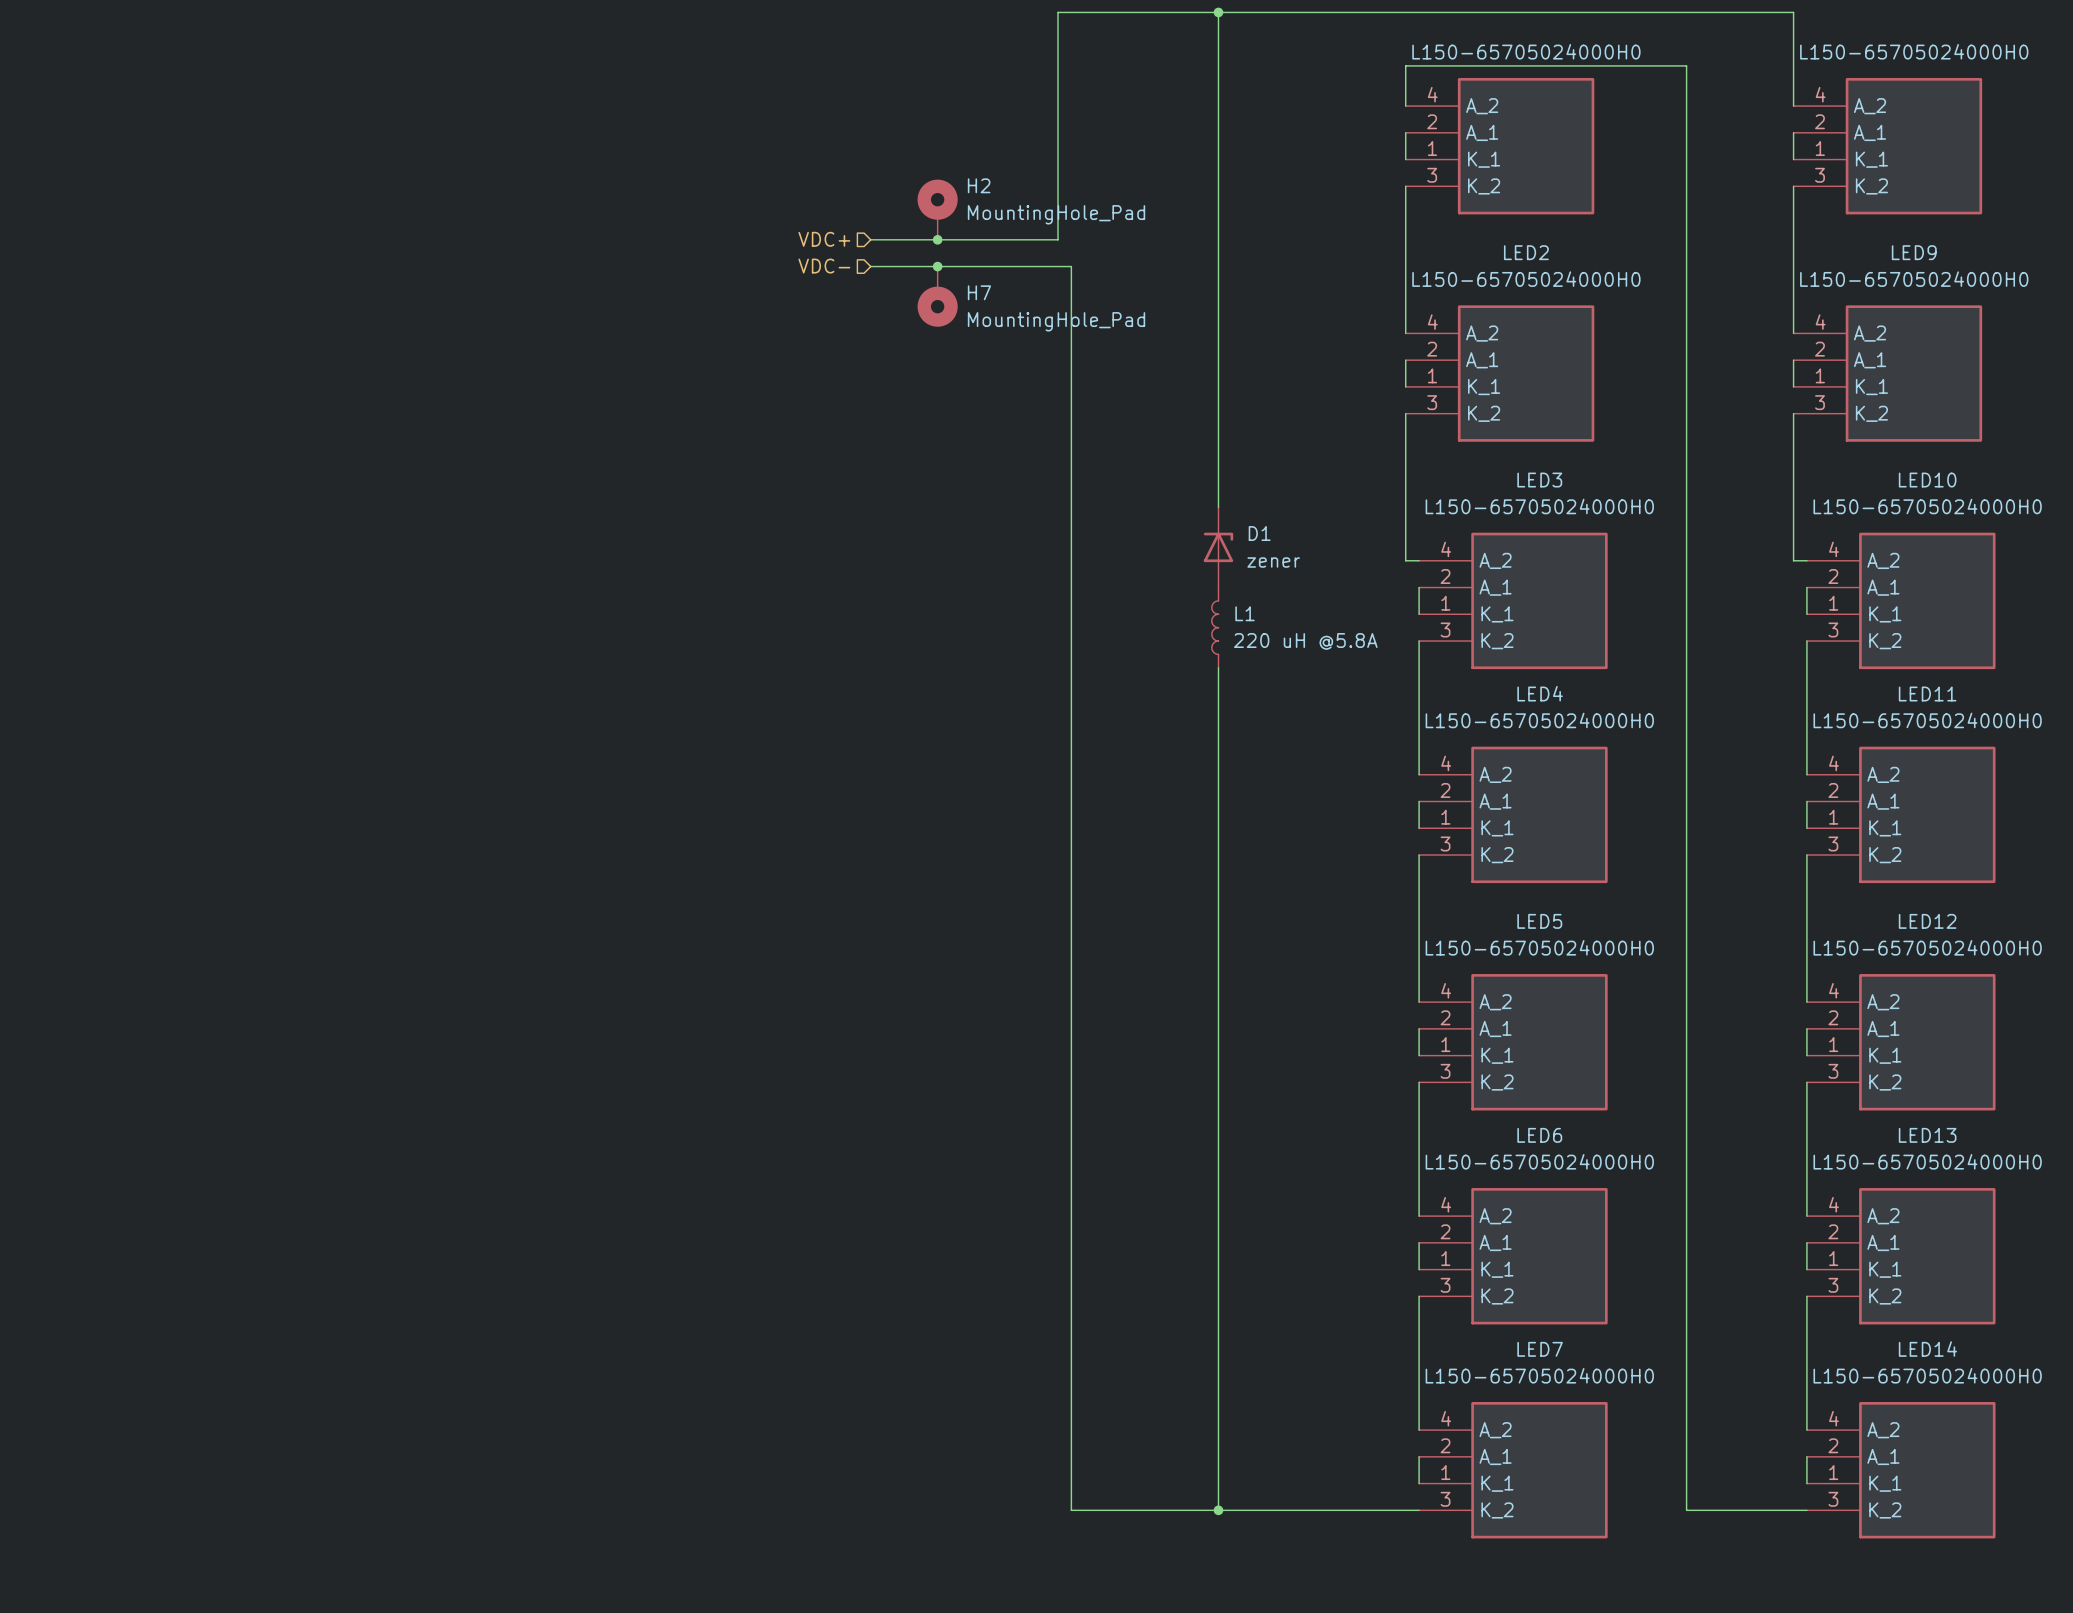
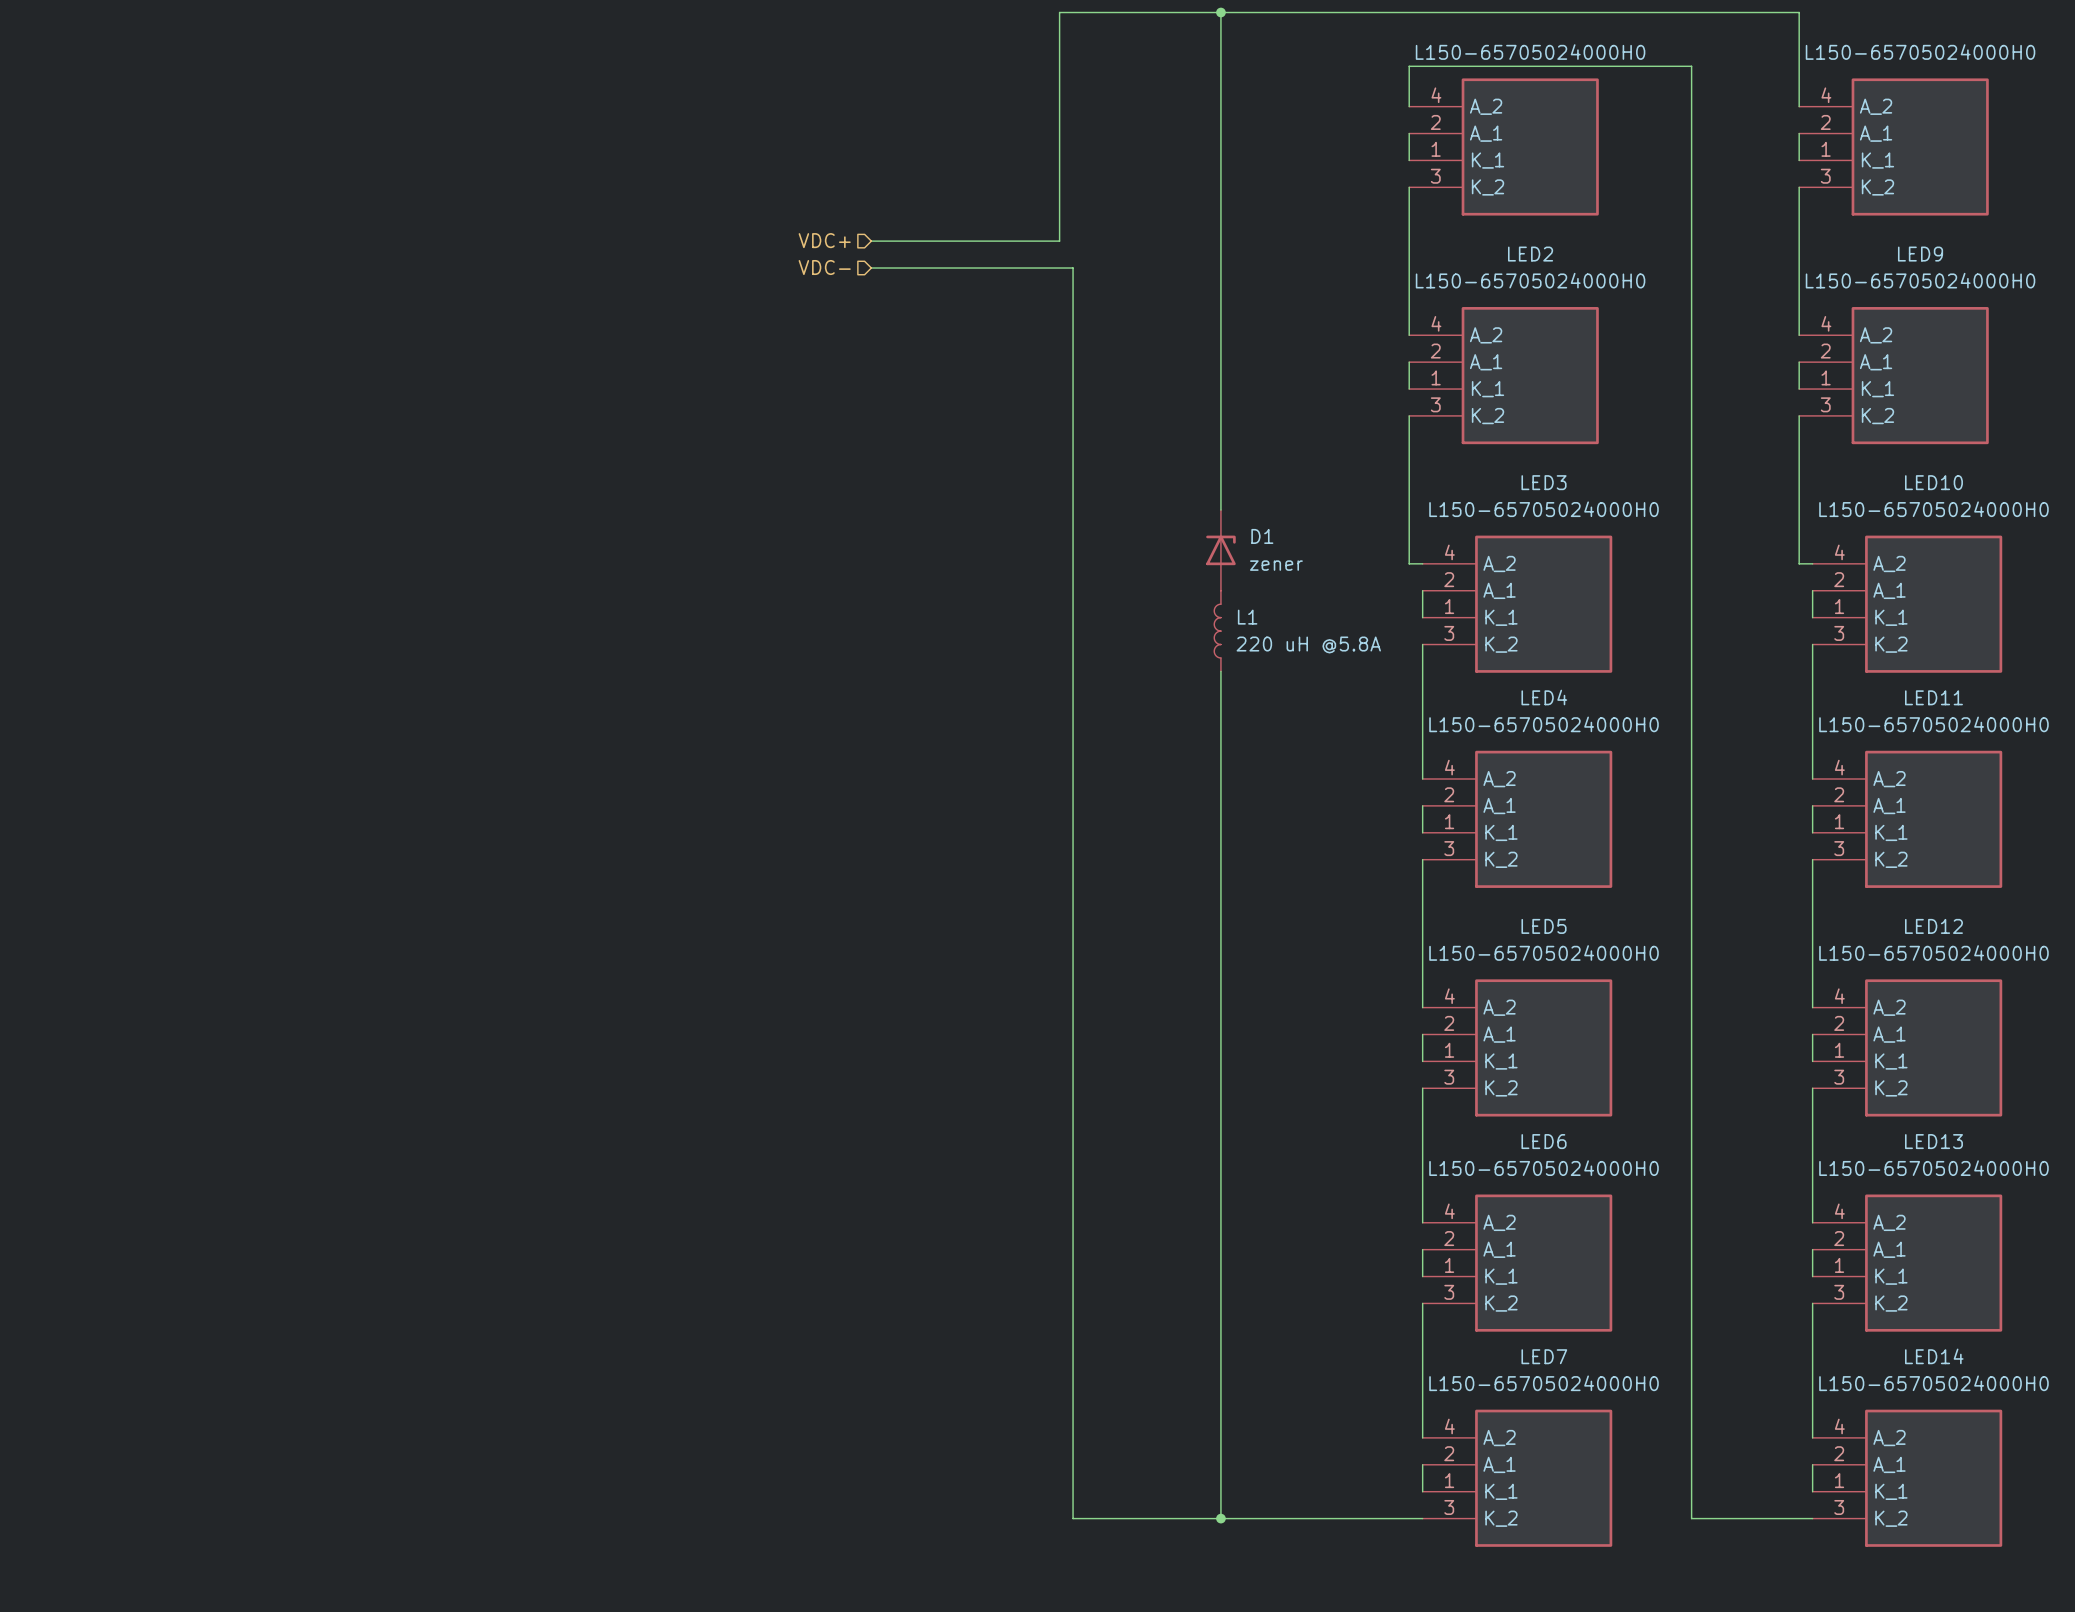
H2: MountingHole_Pad (937, 209) -> none
junction: (937, 239) -> none
junction: (937, 266) -> none
H7: MountingHole_Pad (937, 296) -> none

